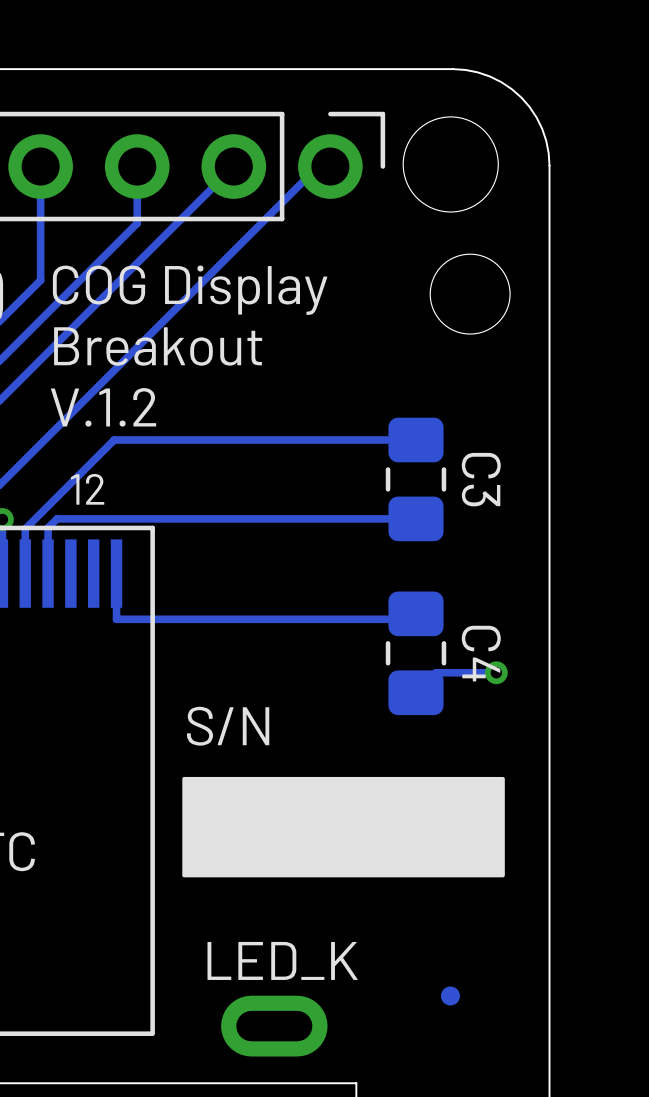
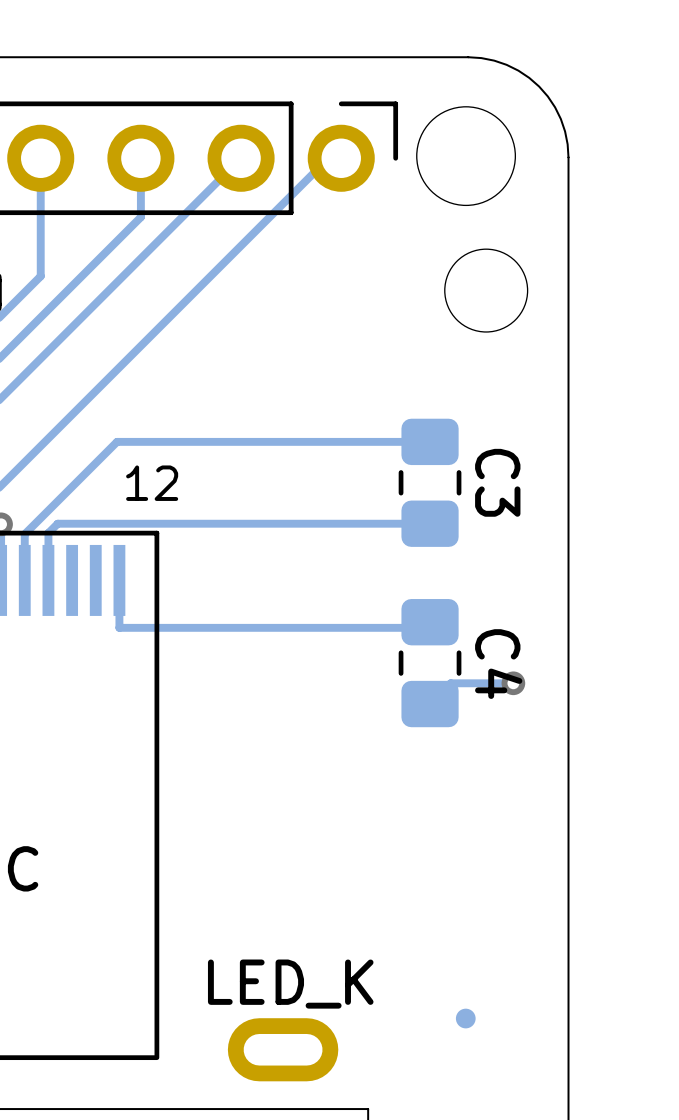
text: COG Display (190, 290) -> none
text: Breakout (158, 346) -> none
text: V.1.2 (103, 407) -> none
text position: 12 (87, 489) -> 12 (152, 483)
text: S/N (228, 726) -> none
drawing: [182, 776, 505, 878] -> none

